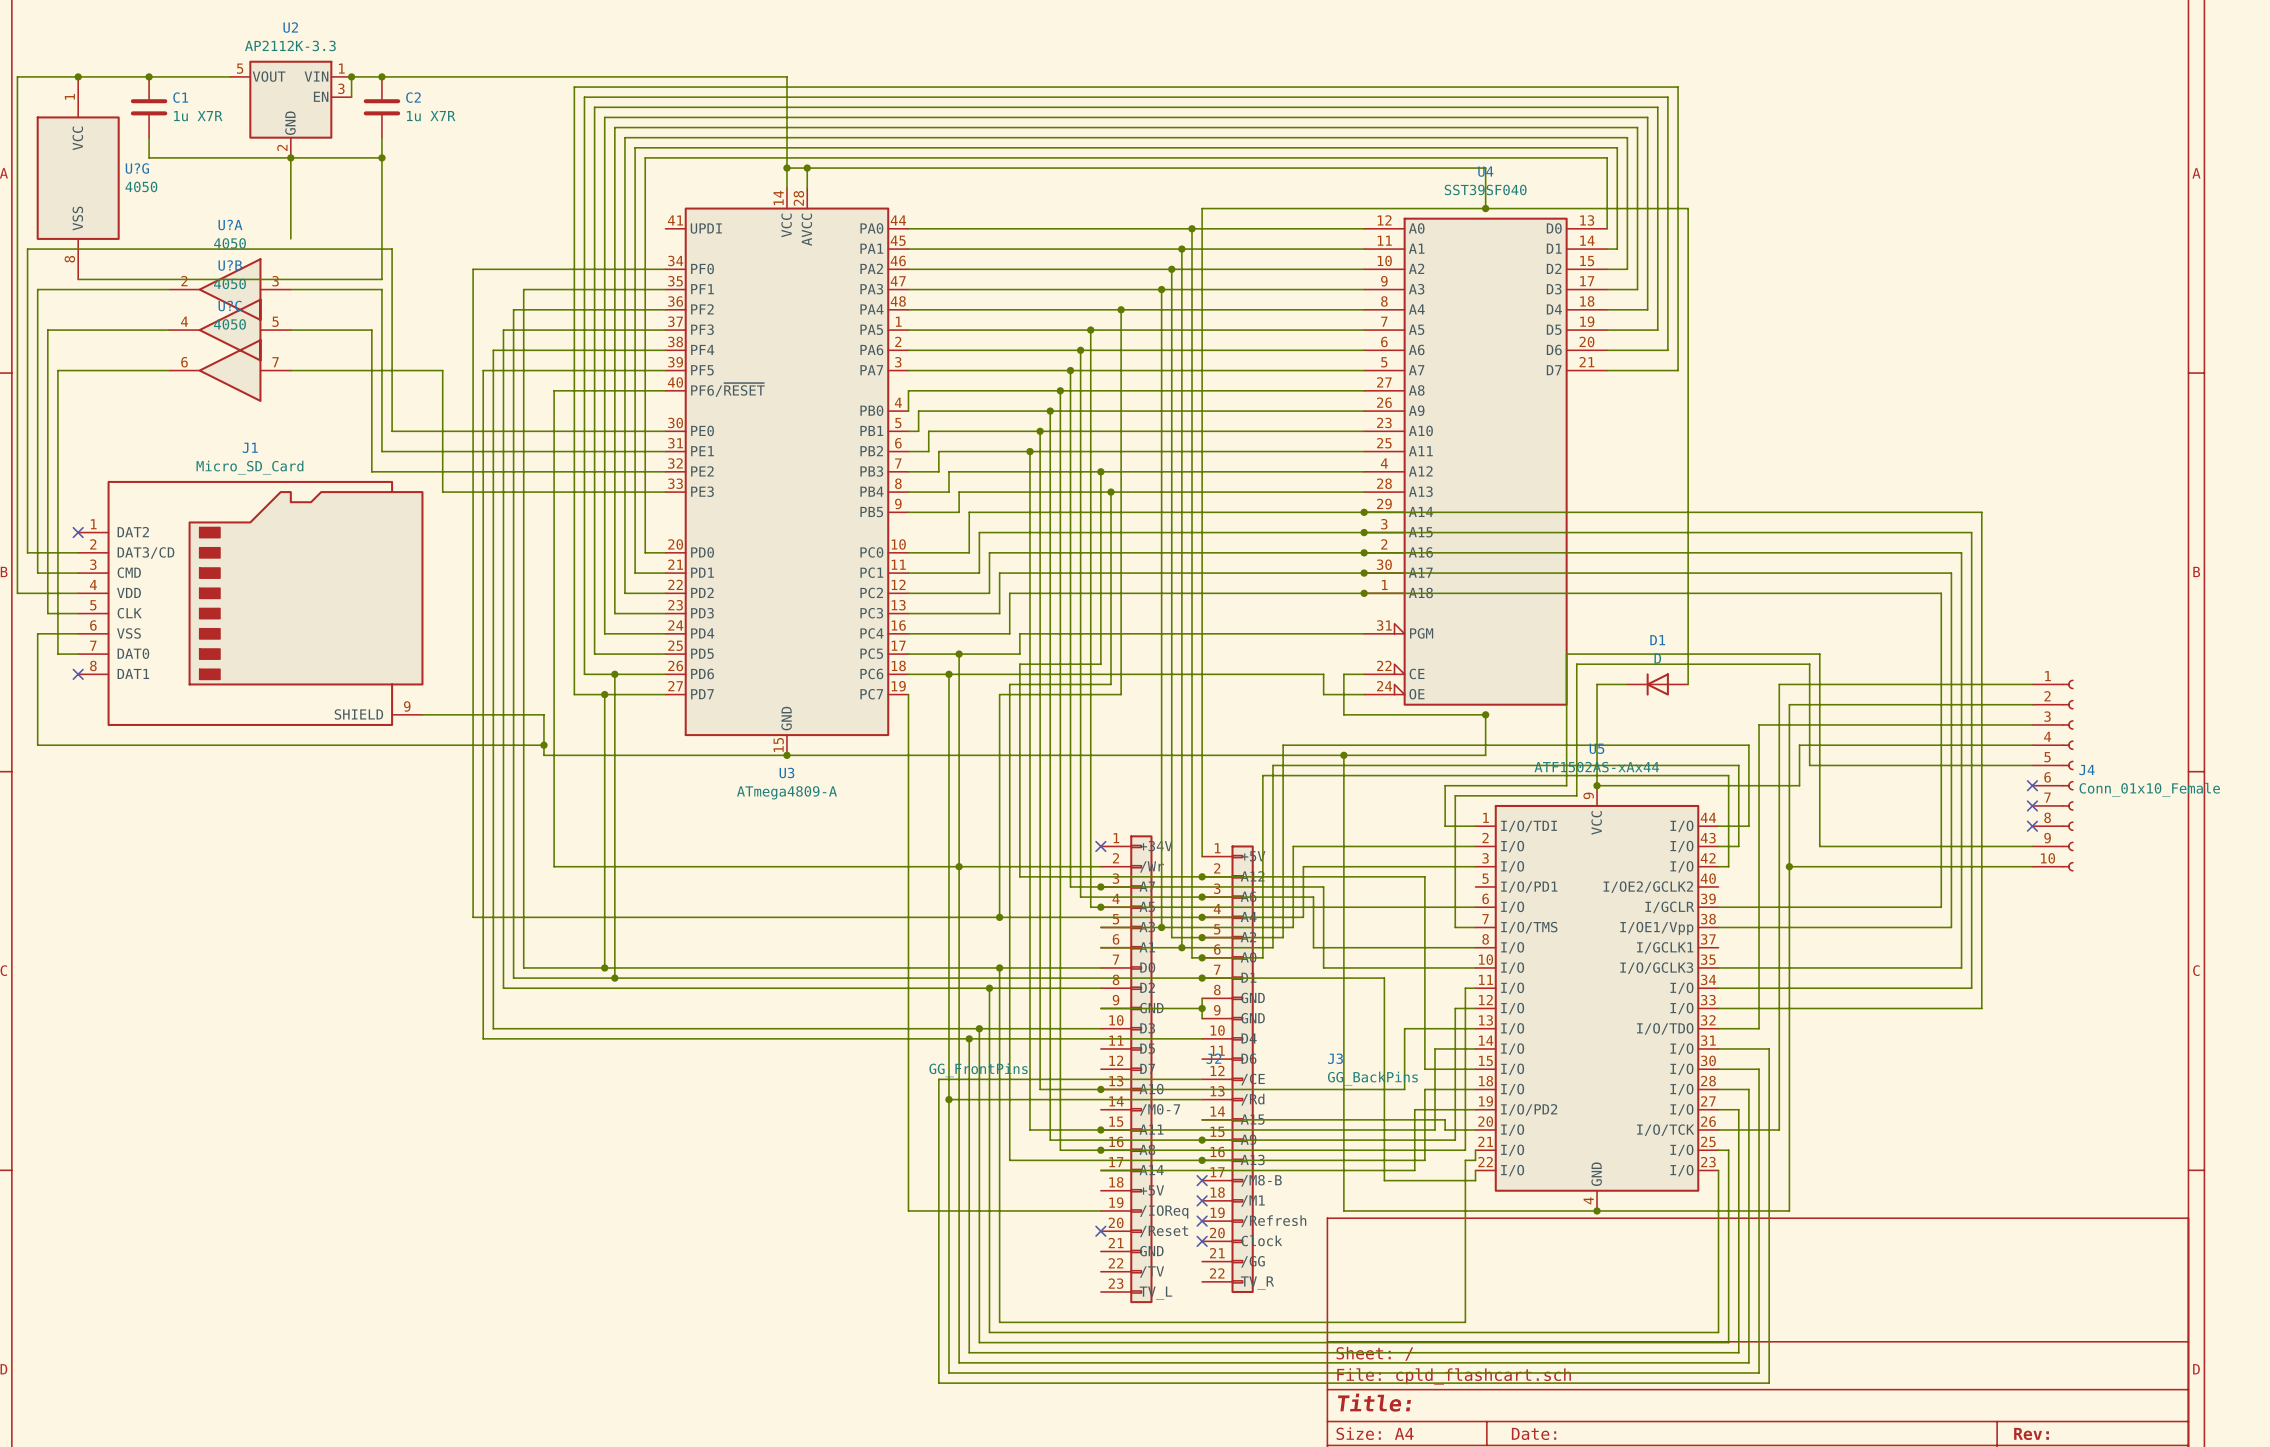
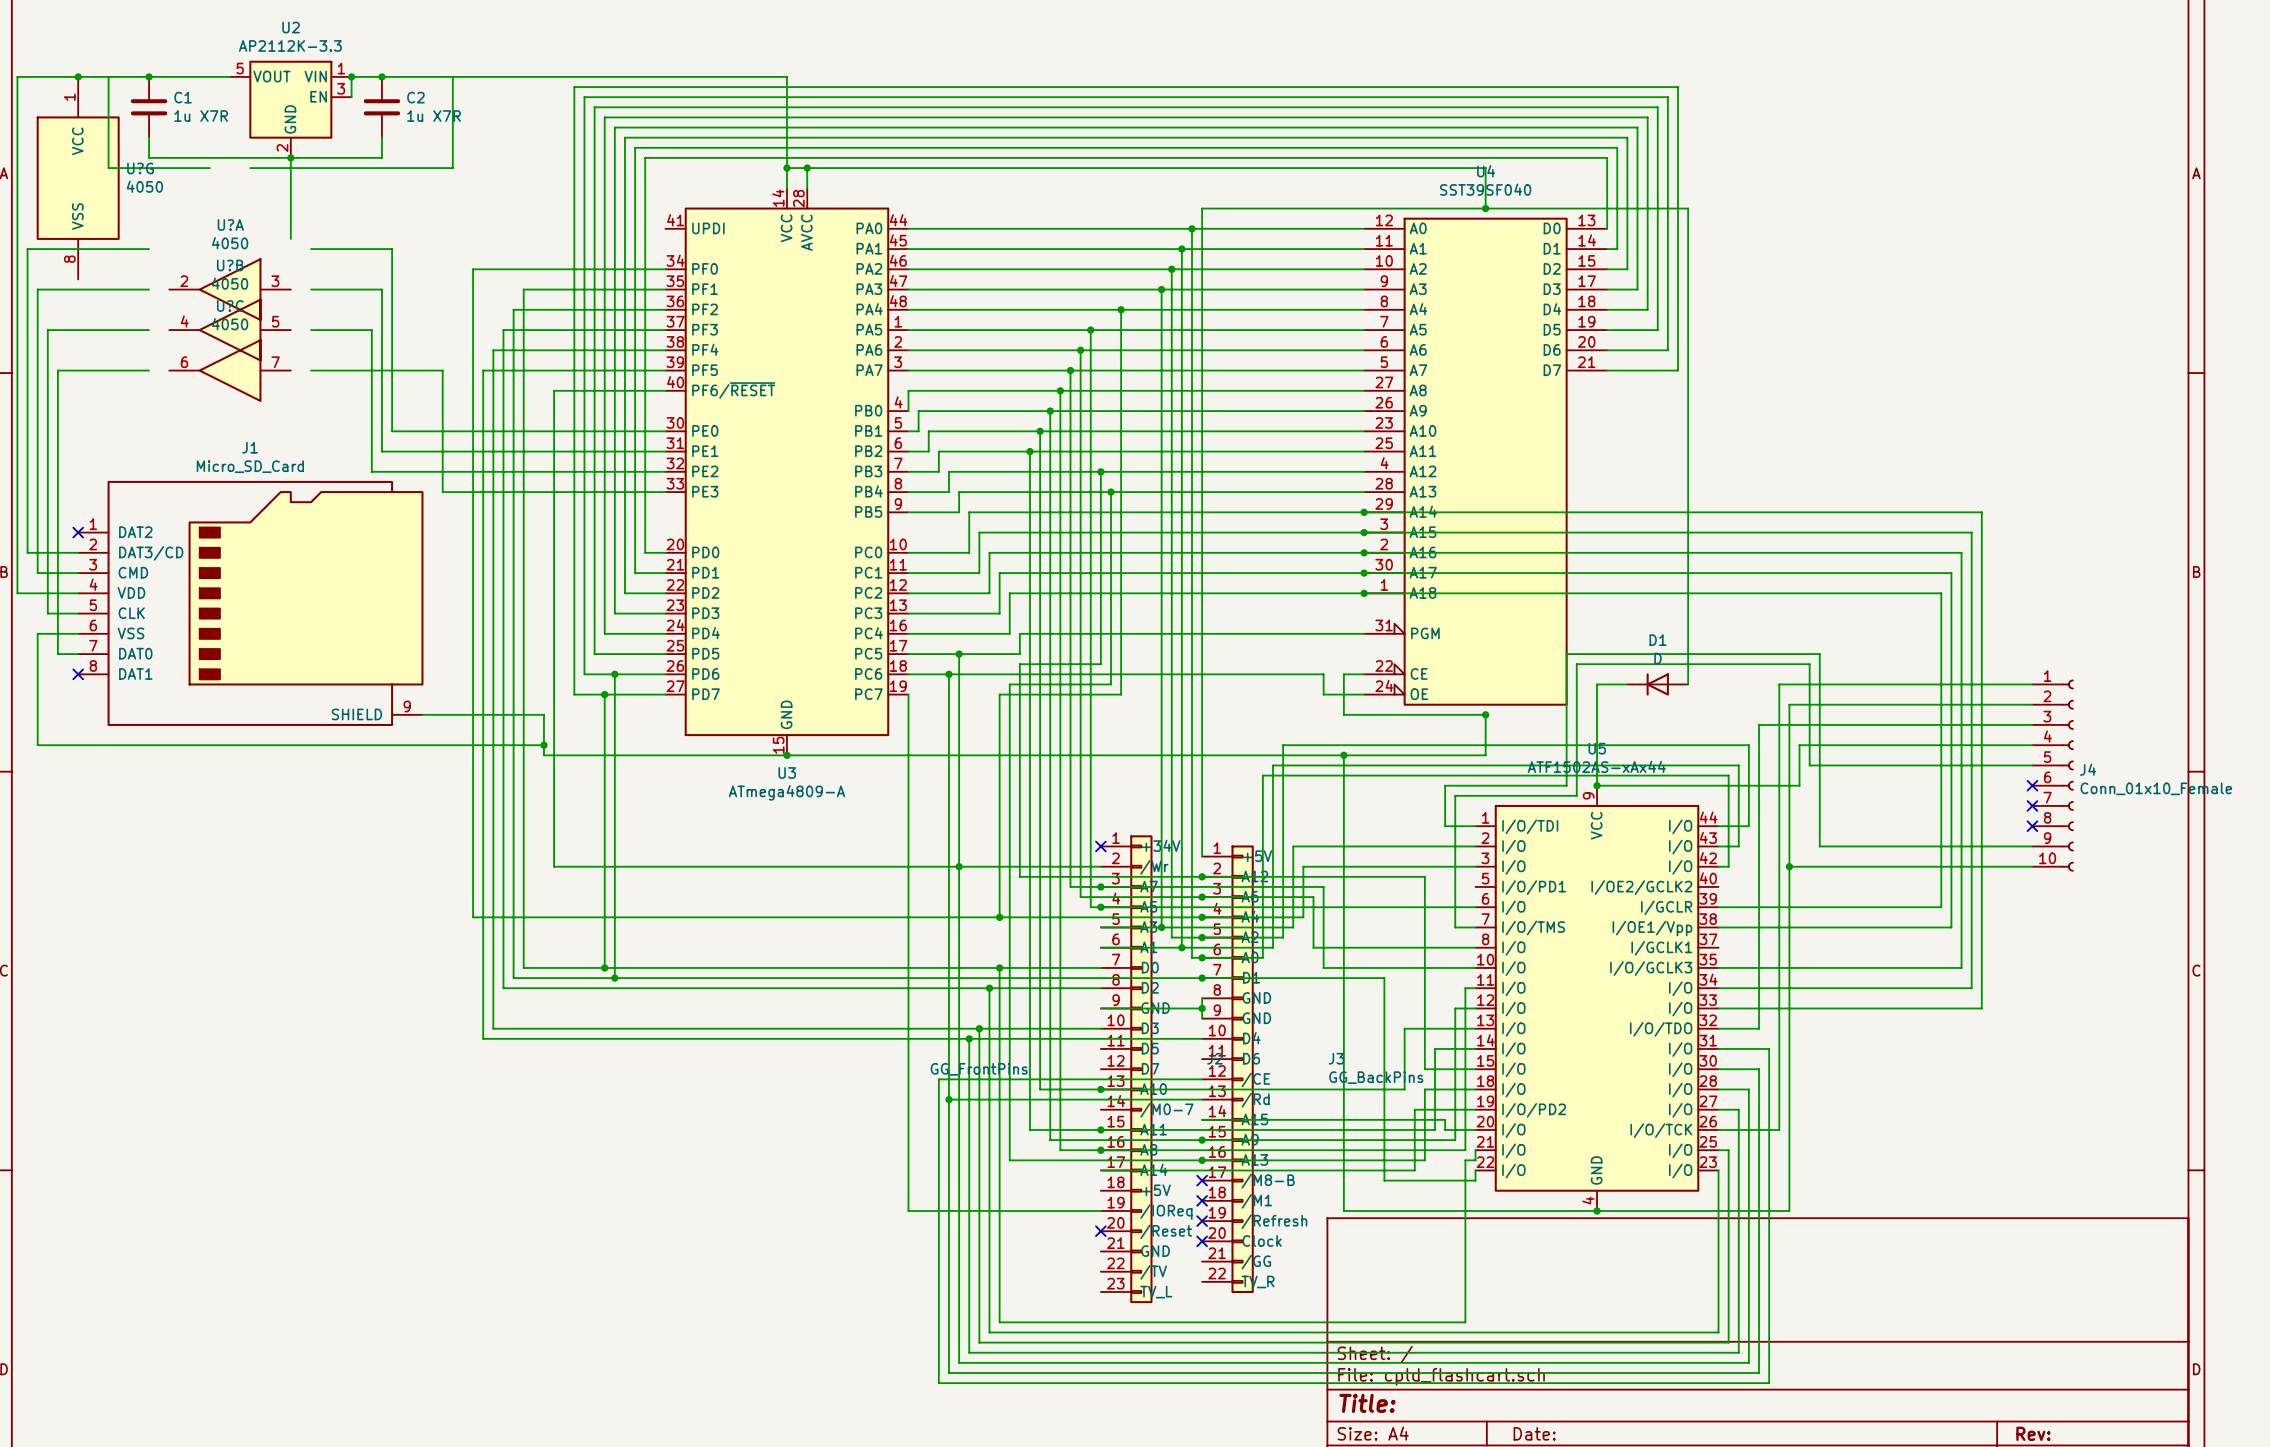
wire: none -> (108, 76) (108, 168) (209, 168)
wire: none -> (452, 76) (452, 168) (250, 168)
wire: (381, 157) (381, 279) (78, 279) -> none
junction: (381, 157) -> none
wire: (149, 249) (311, 249) -> none
wire: (149, 289) (169, 289) -> none
wire: (290, 289) (311, 289) -> none
wire: (149, 330) (169, 330) -> none
wire: (290, 330) (311, 330) -> none
wire: (149, 370) (169, 370) -> none
wire: (290, 370) (311, 370) -> none

